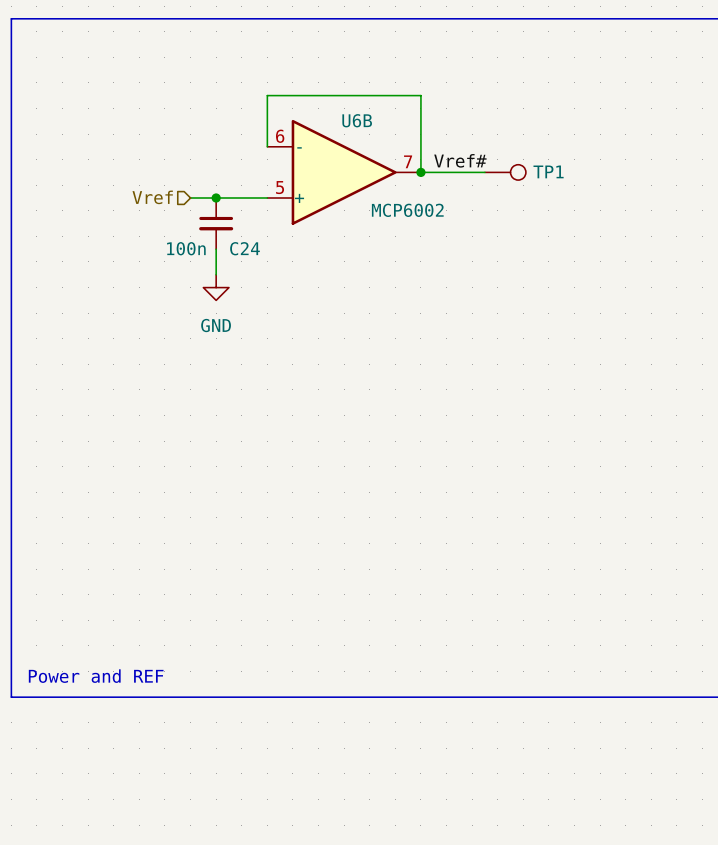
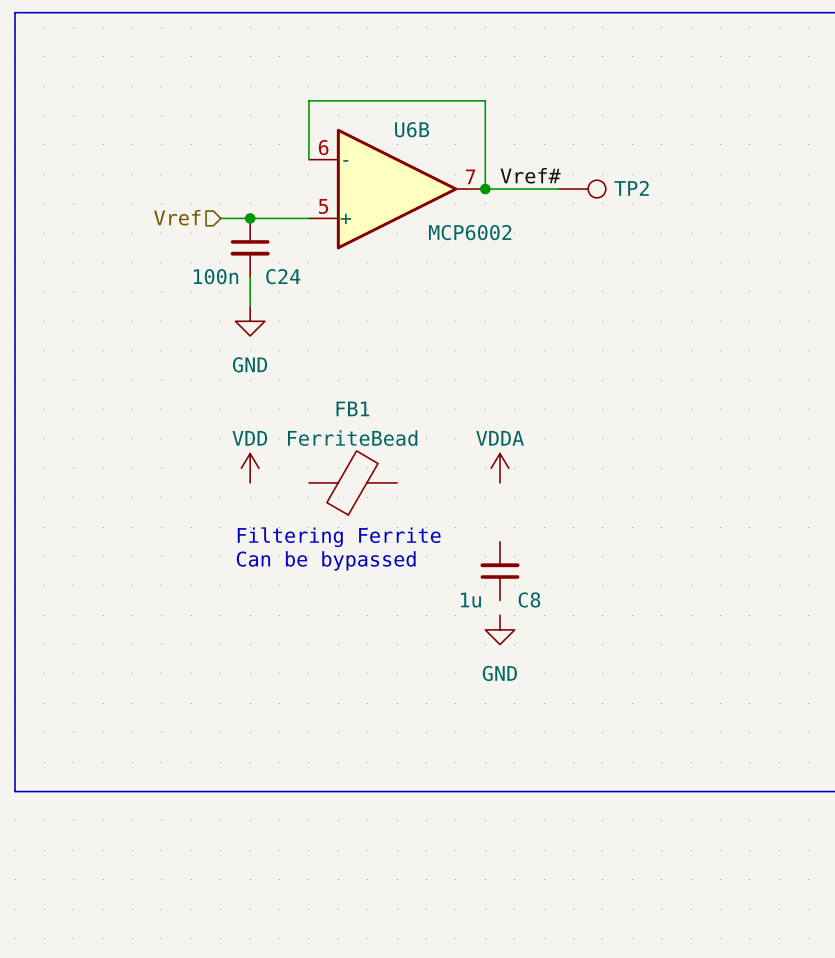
TP1 name: TP1 (548, 171) -> TP2 (631, 188)
power symbol: none -> VDD (250, 468)
power symbol: none -> VDDA (499, 468)
FB1: none -> FerriteBead (353, 482)
text: none -> Filtering Ferrite (339, 537)
text: none -> Can be bypassed (326, 560)
C8: none -> 1u (499, 571)
power symbol: none -> GND (499, 629)
text: Power and REF (96, 676) -> none

